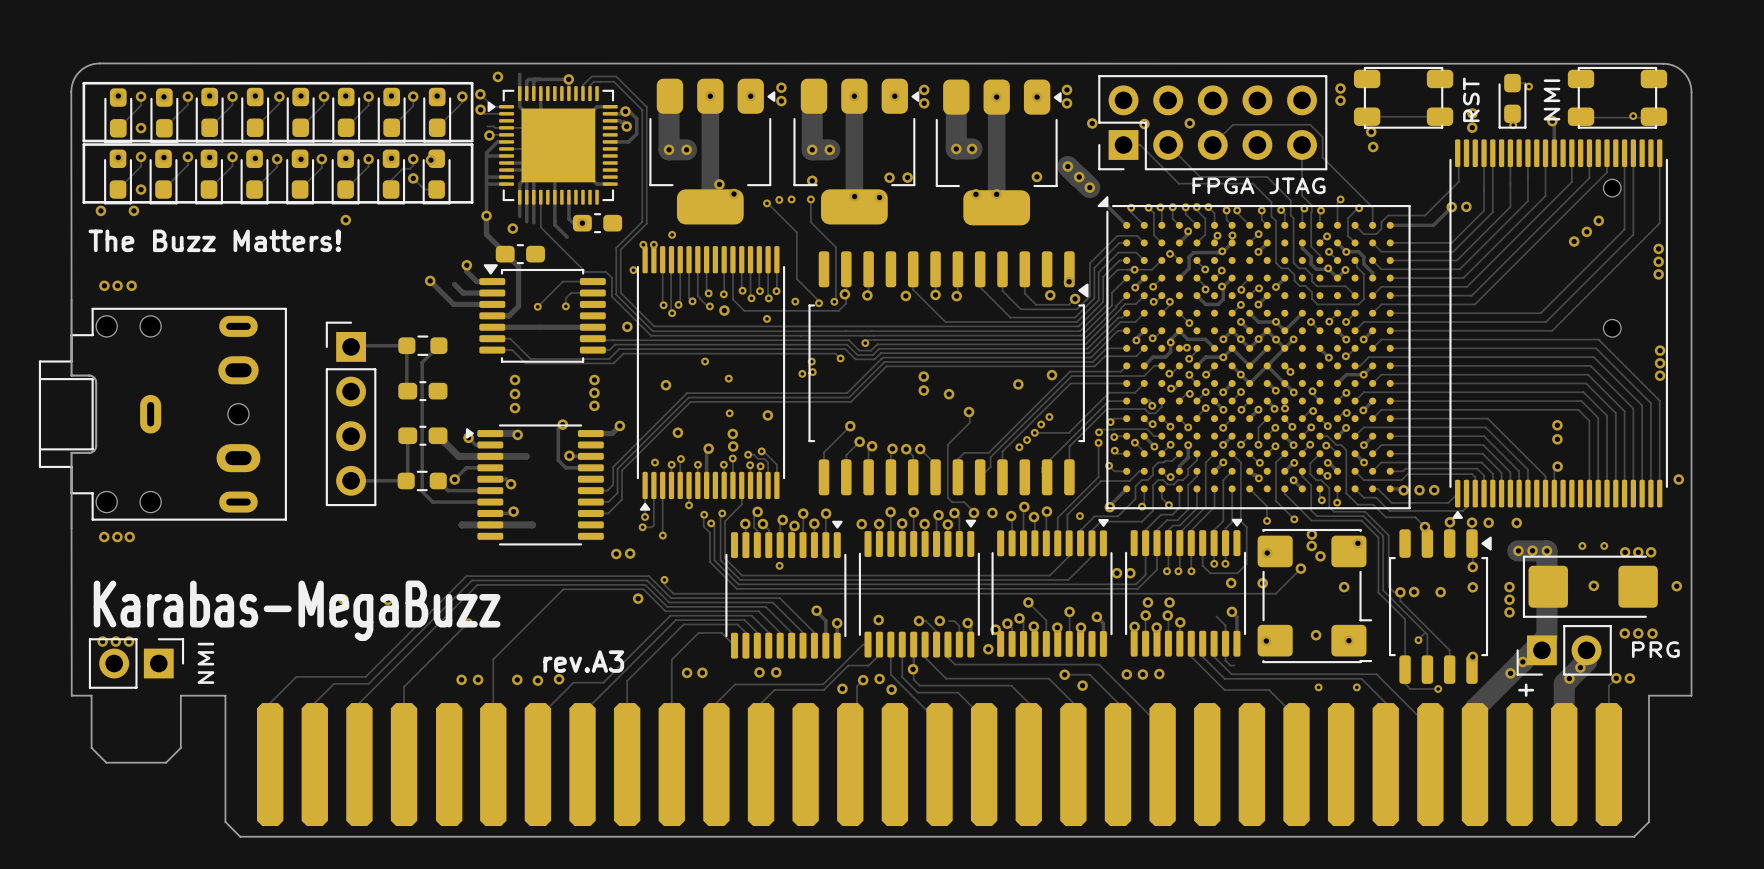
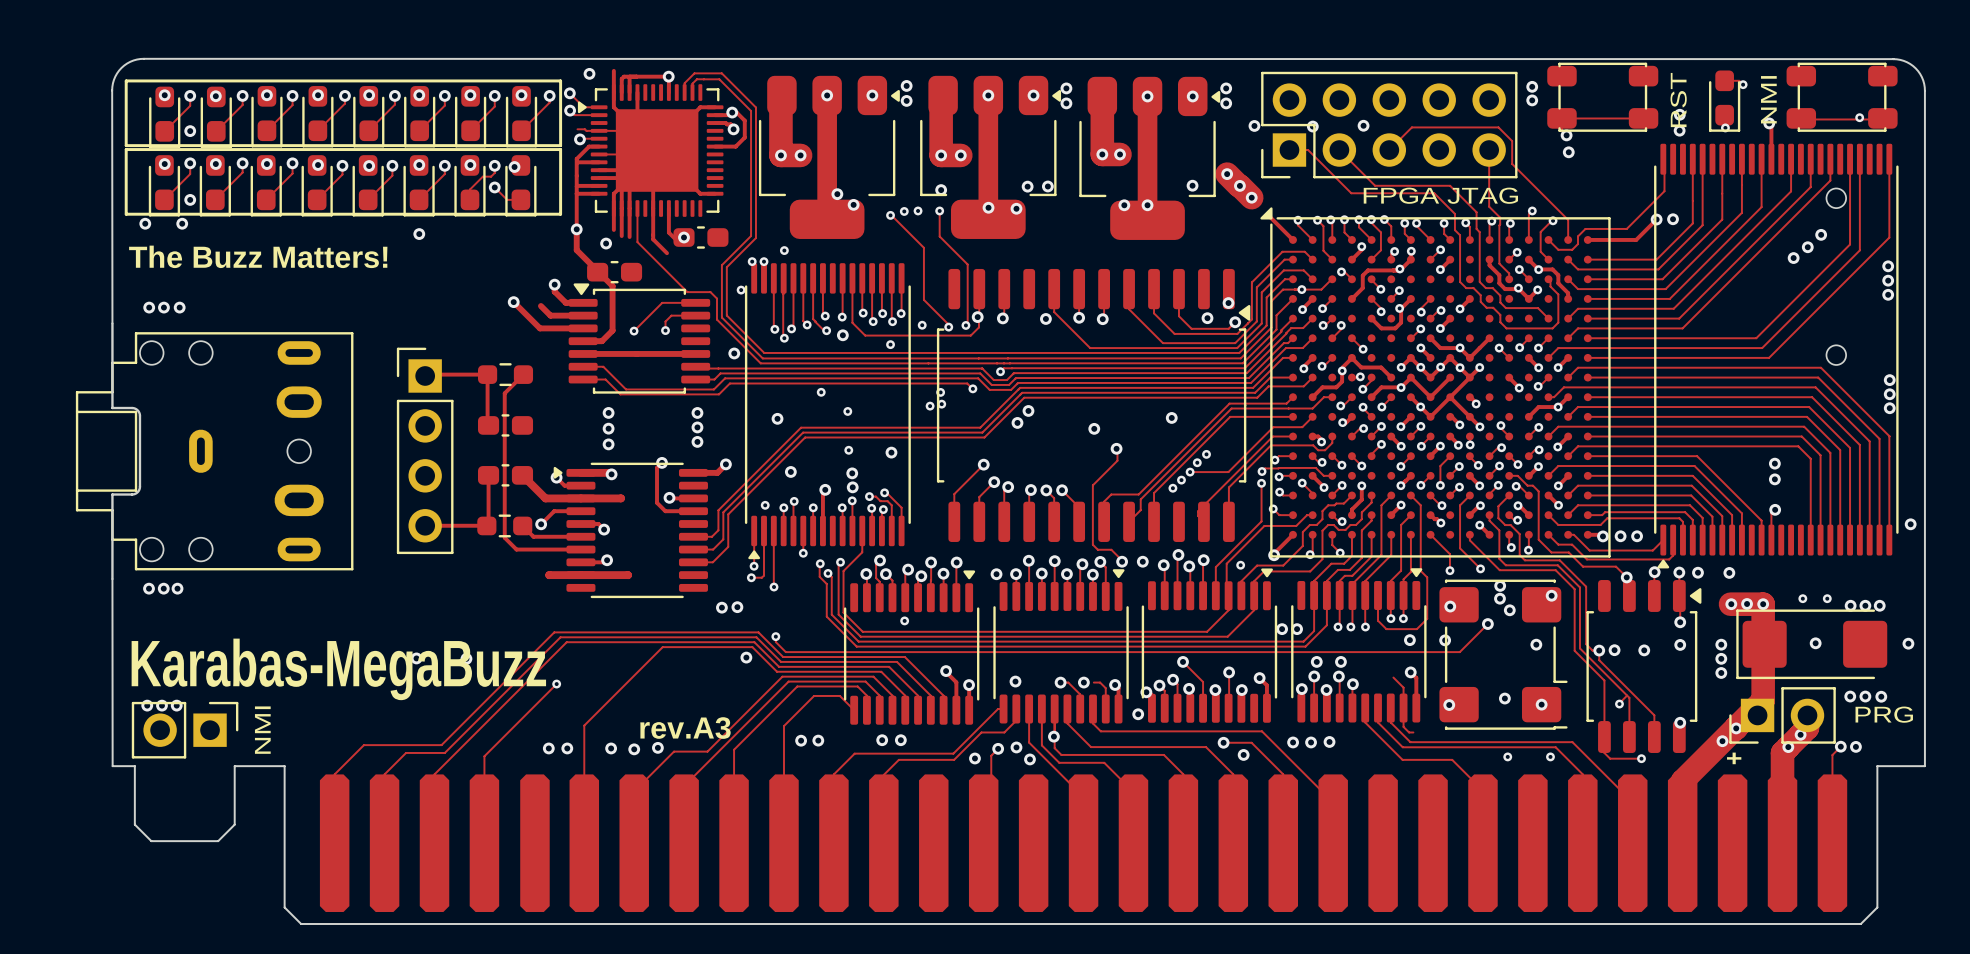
via: (1051, 375) -> none
via: (923, 376) -> none
via: none -> (1028, 410)
via: none -> (1017, 422)
via: (923, 390) -> none

